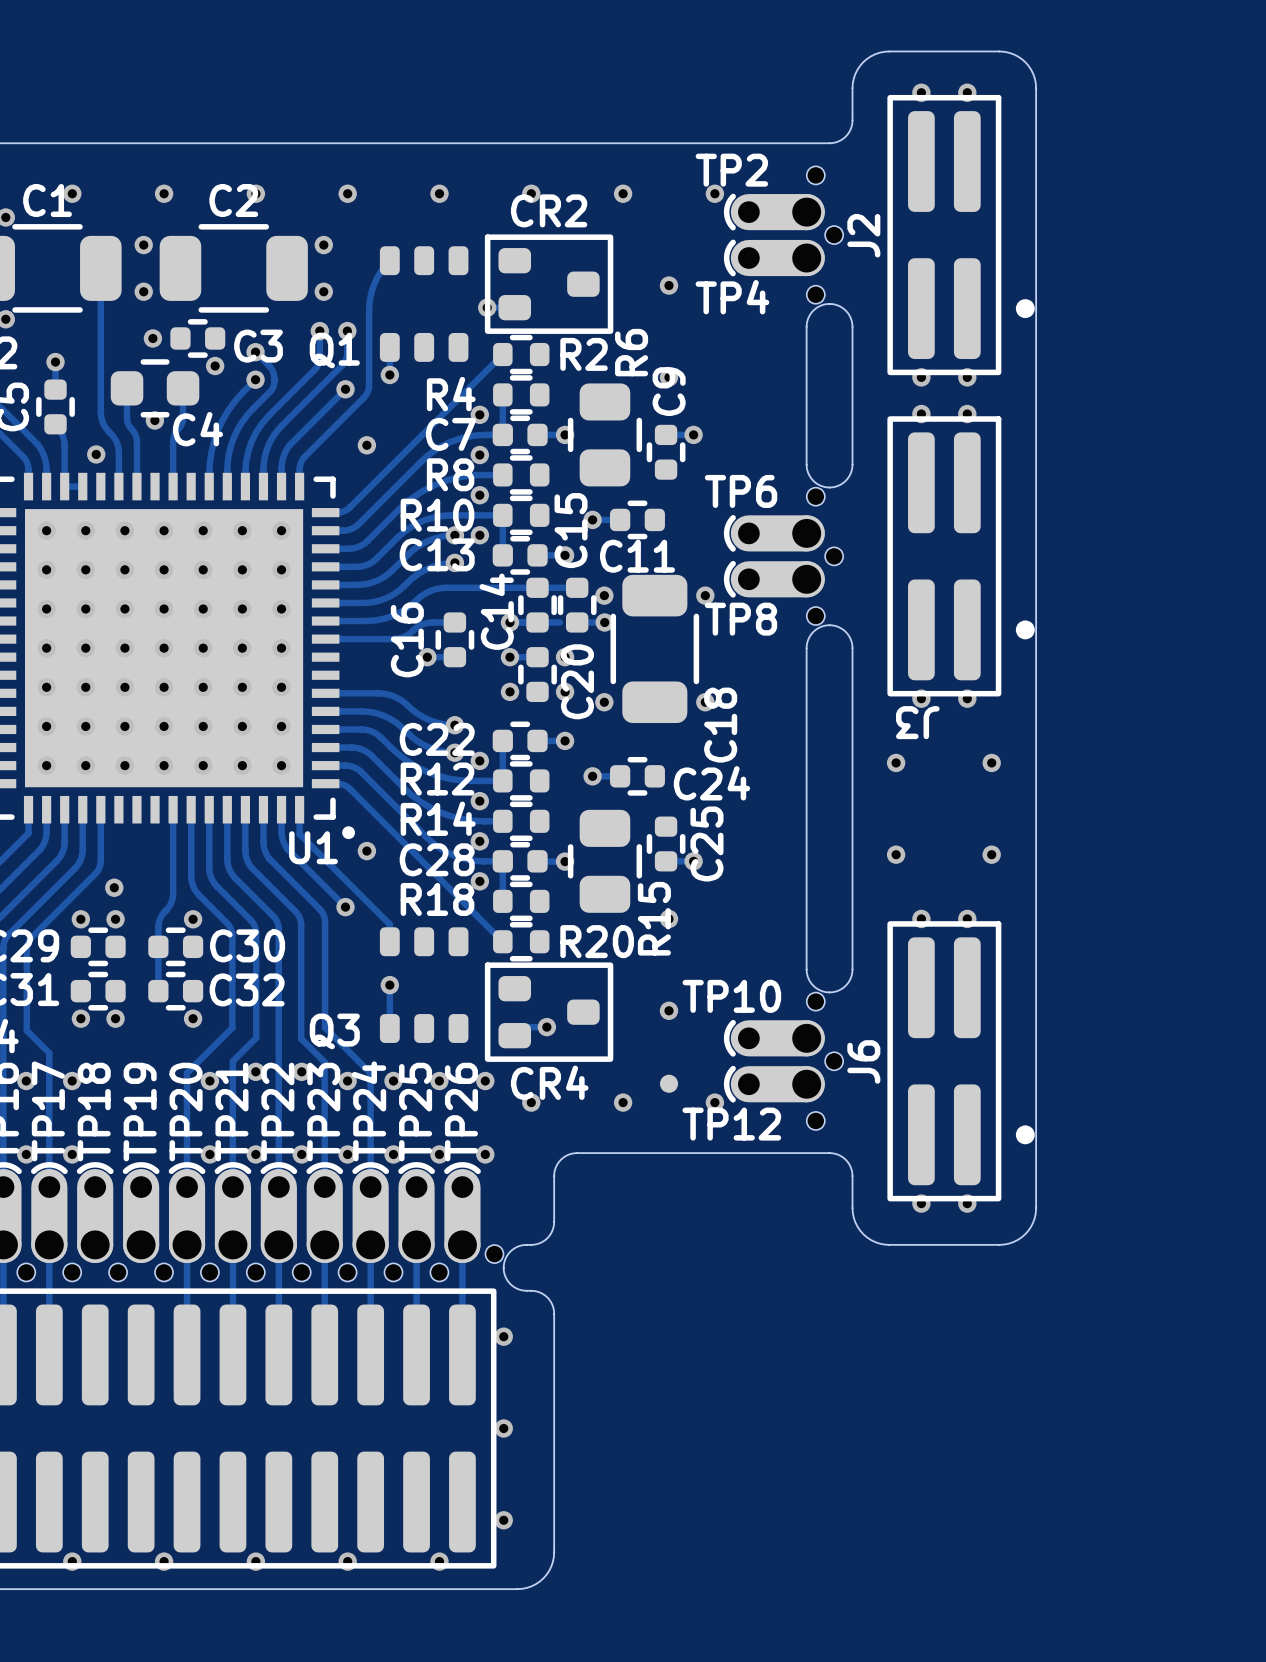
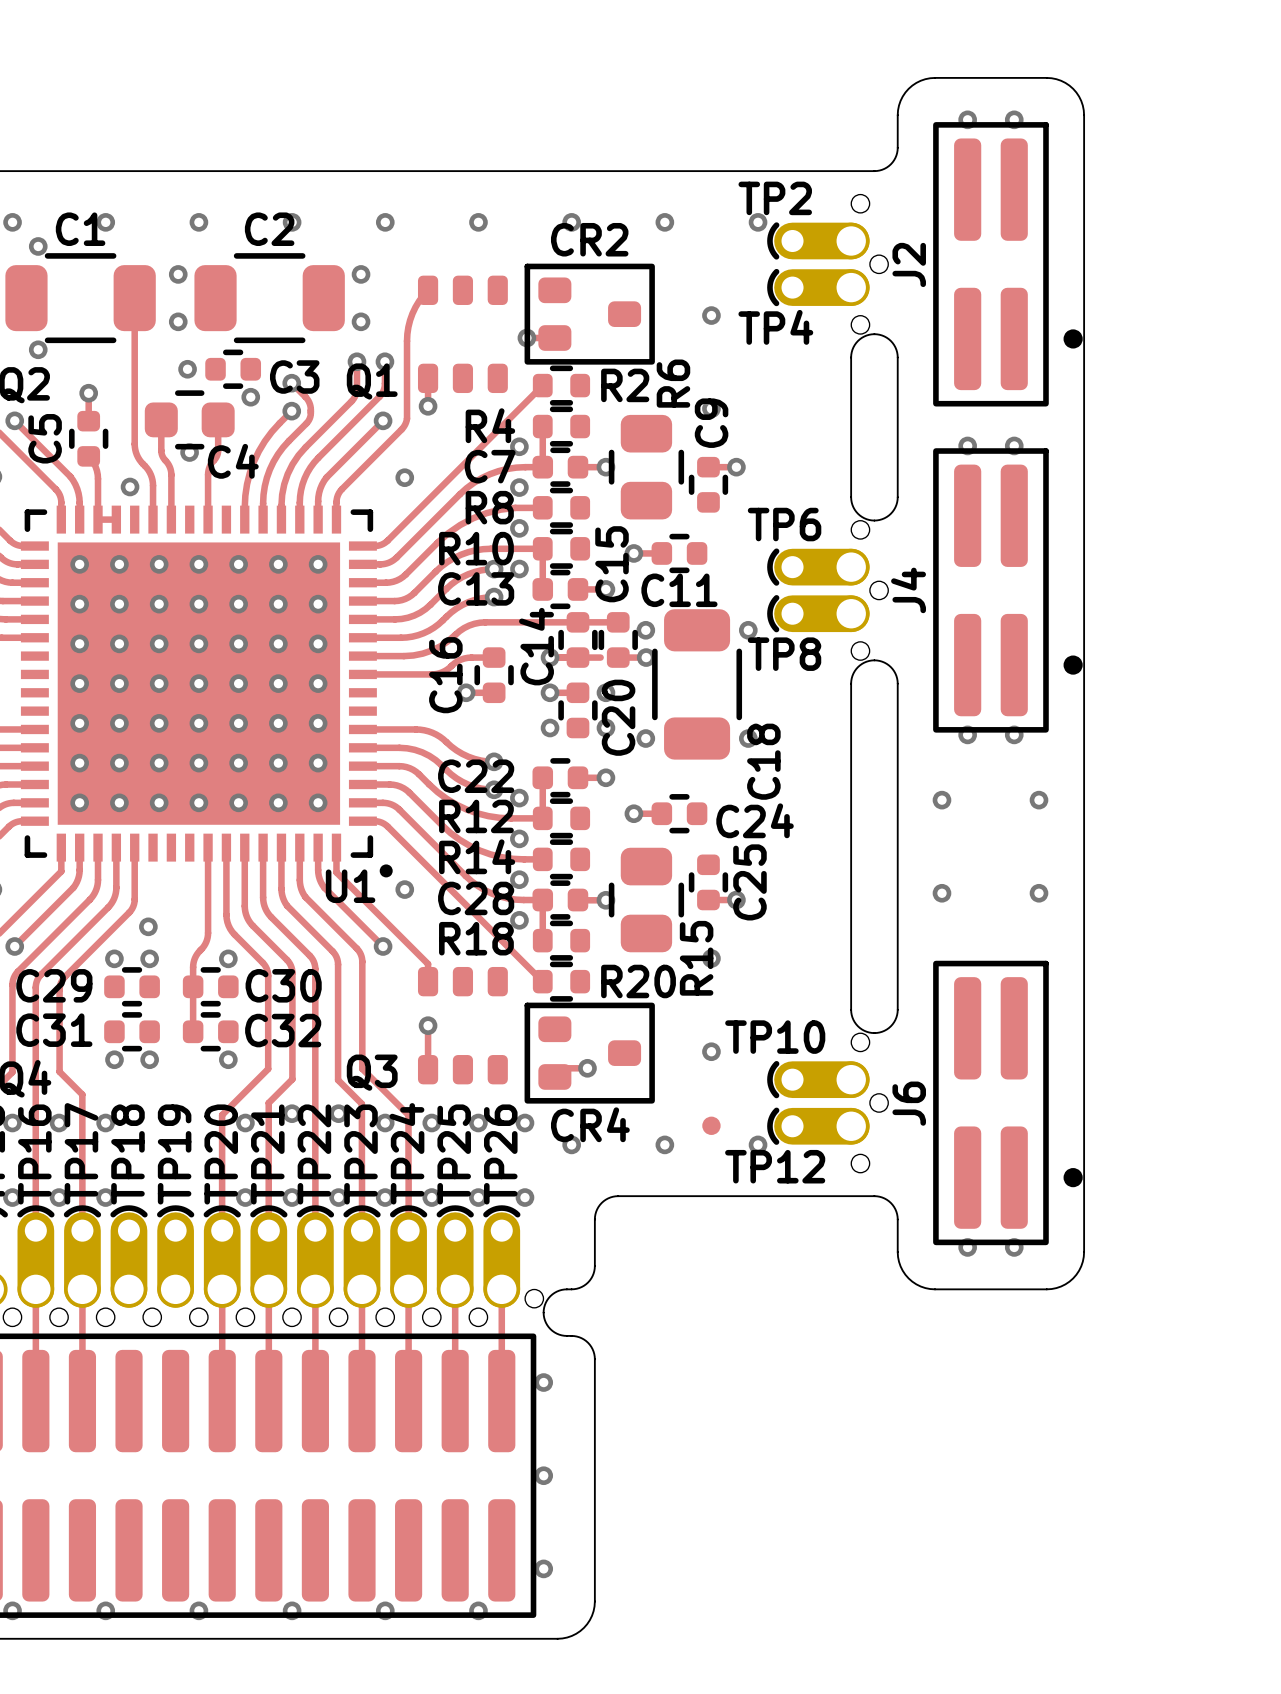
via: (921, 377) -> none
via: (967, 377) -> none
J3 name: J3 (917, 722) -> J4 (908, 590)
via: (921, 918) -> none
via: (967, 918) -> none

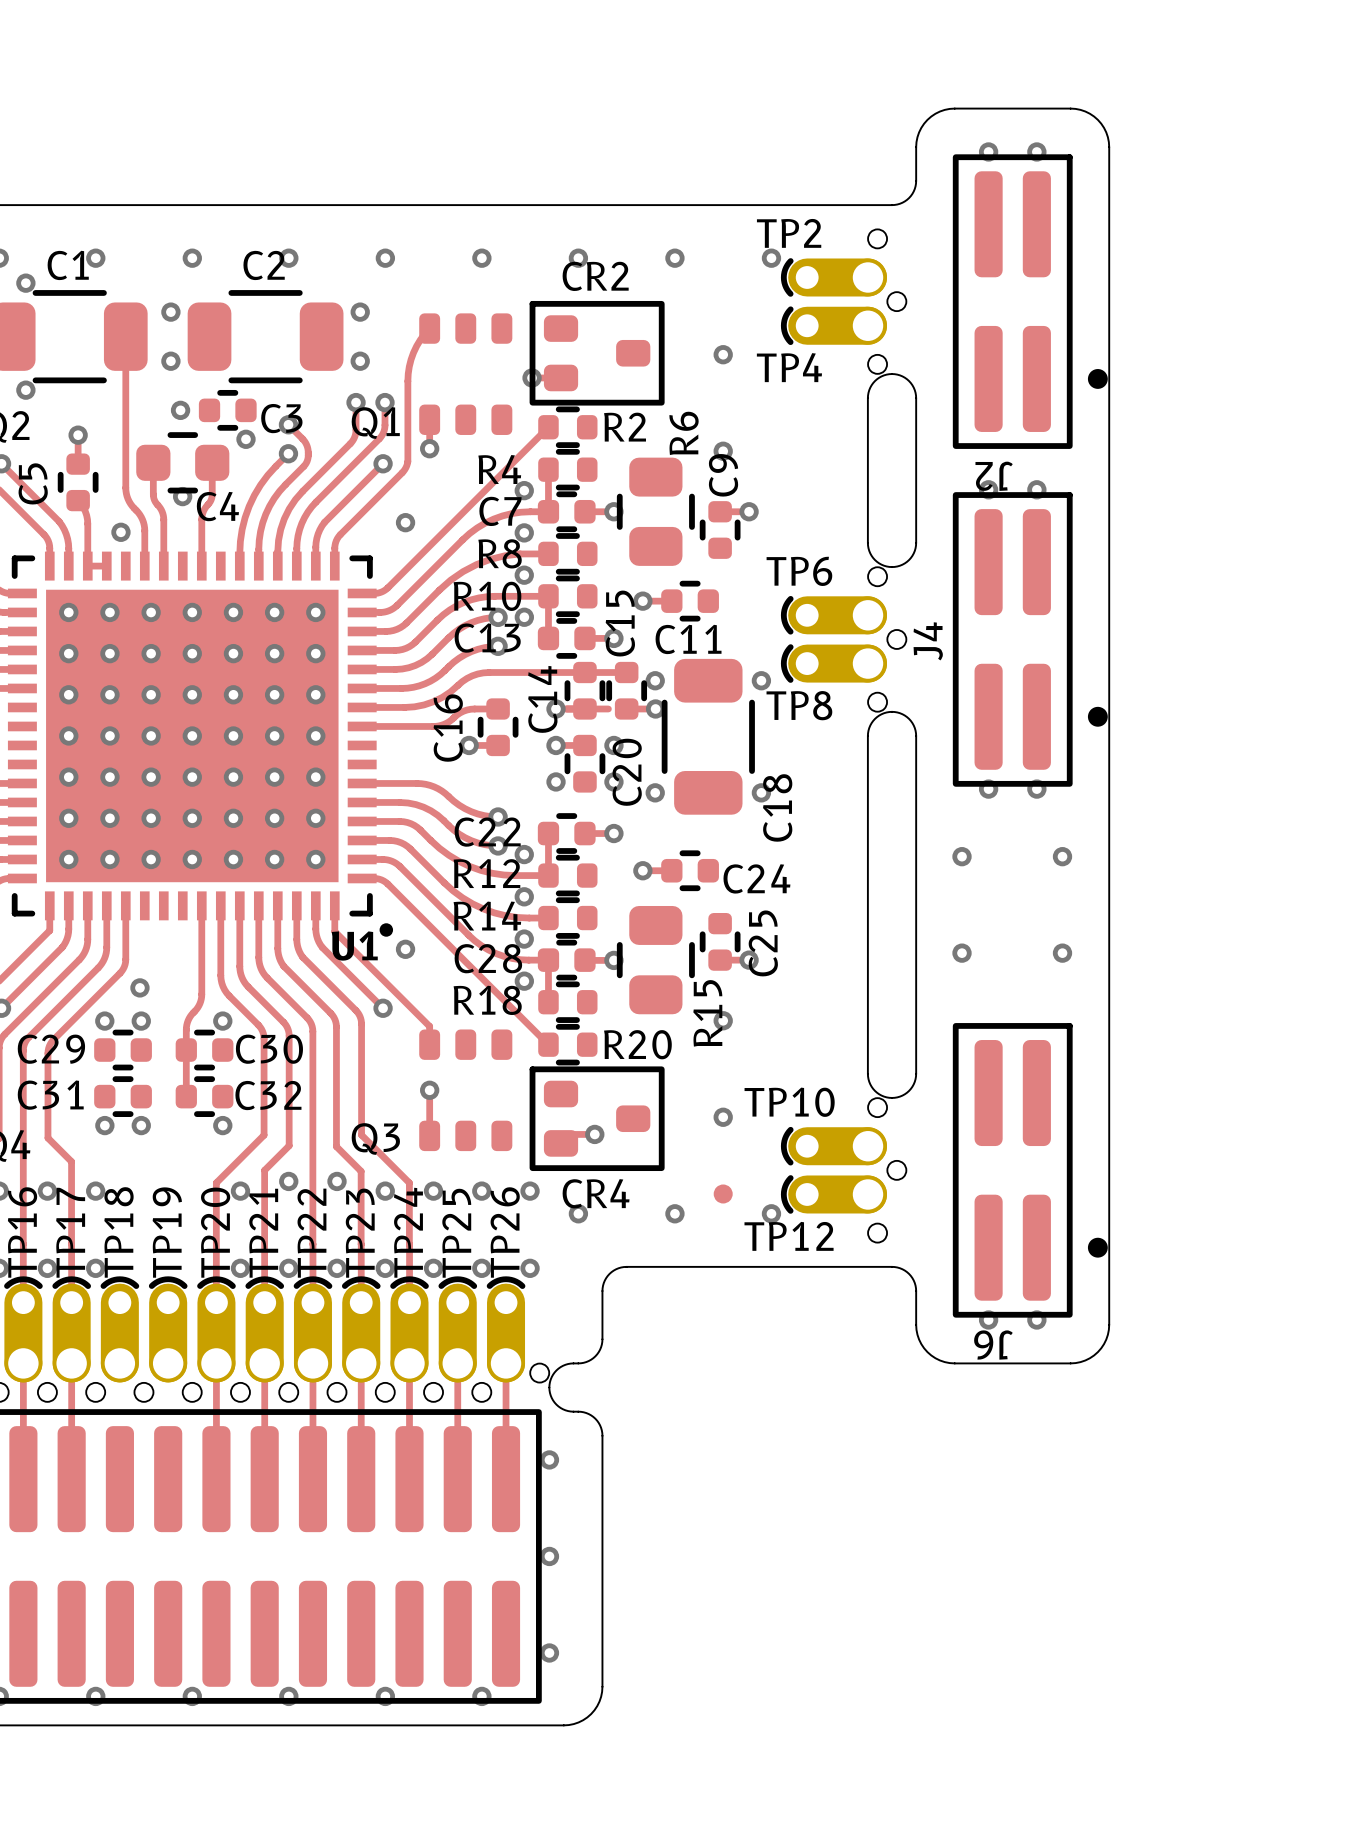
J2 name rotation: 0° (909, 264) -> 90° counterclockwise (994, 476)
J2 name position: J2 (909, 264) -> J2 (994, 476)
J6 name rotation: 0° (909, 1103) -> 90° counterclockwise (993, 1345)
J6 name position: J6 (909, 1103) -> J6 (993, 1345)

